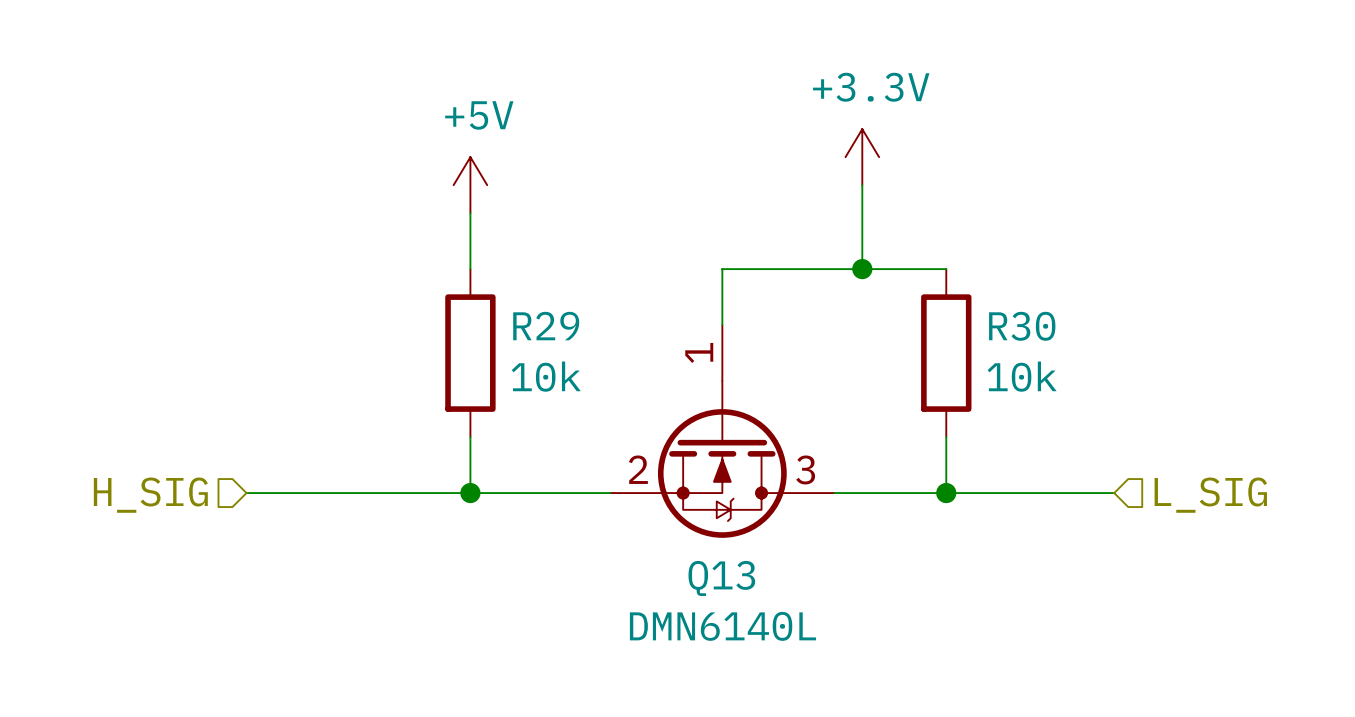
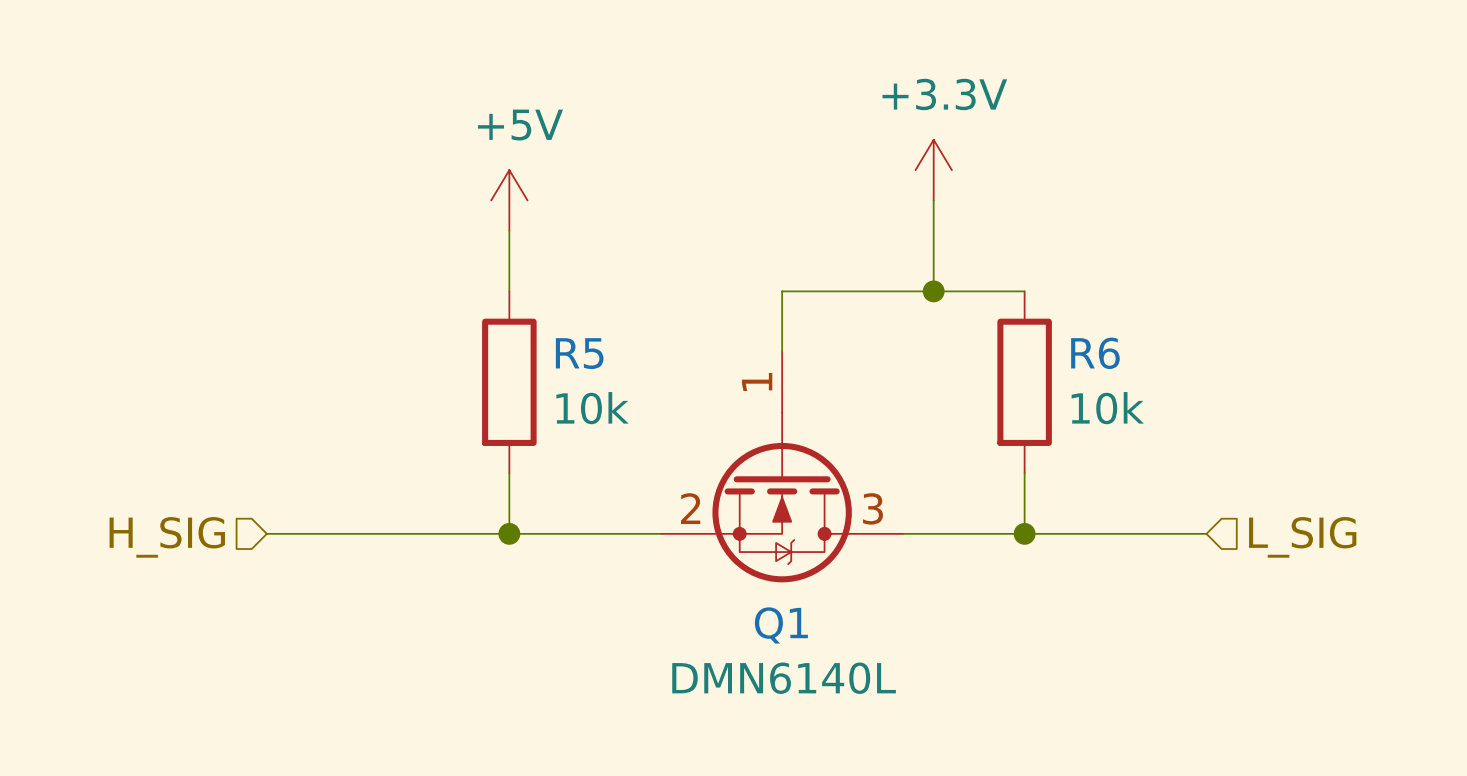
R29 name: R29 (546, 326) -> R5 (579, 353)
R30 name: R30 (1022, 326) -> R6 (1095, 353)
Q13 name: Q13 (721, 578) -> Q1 (781, 625)

